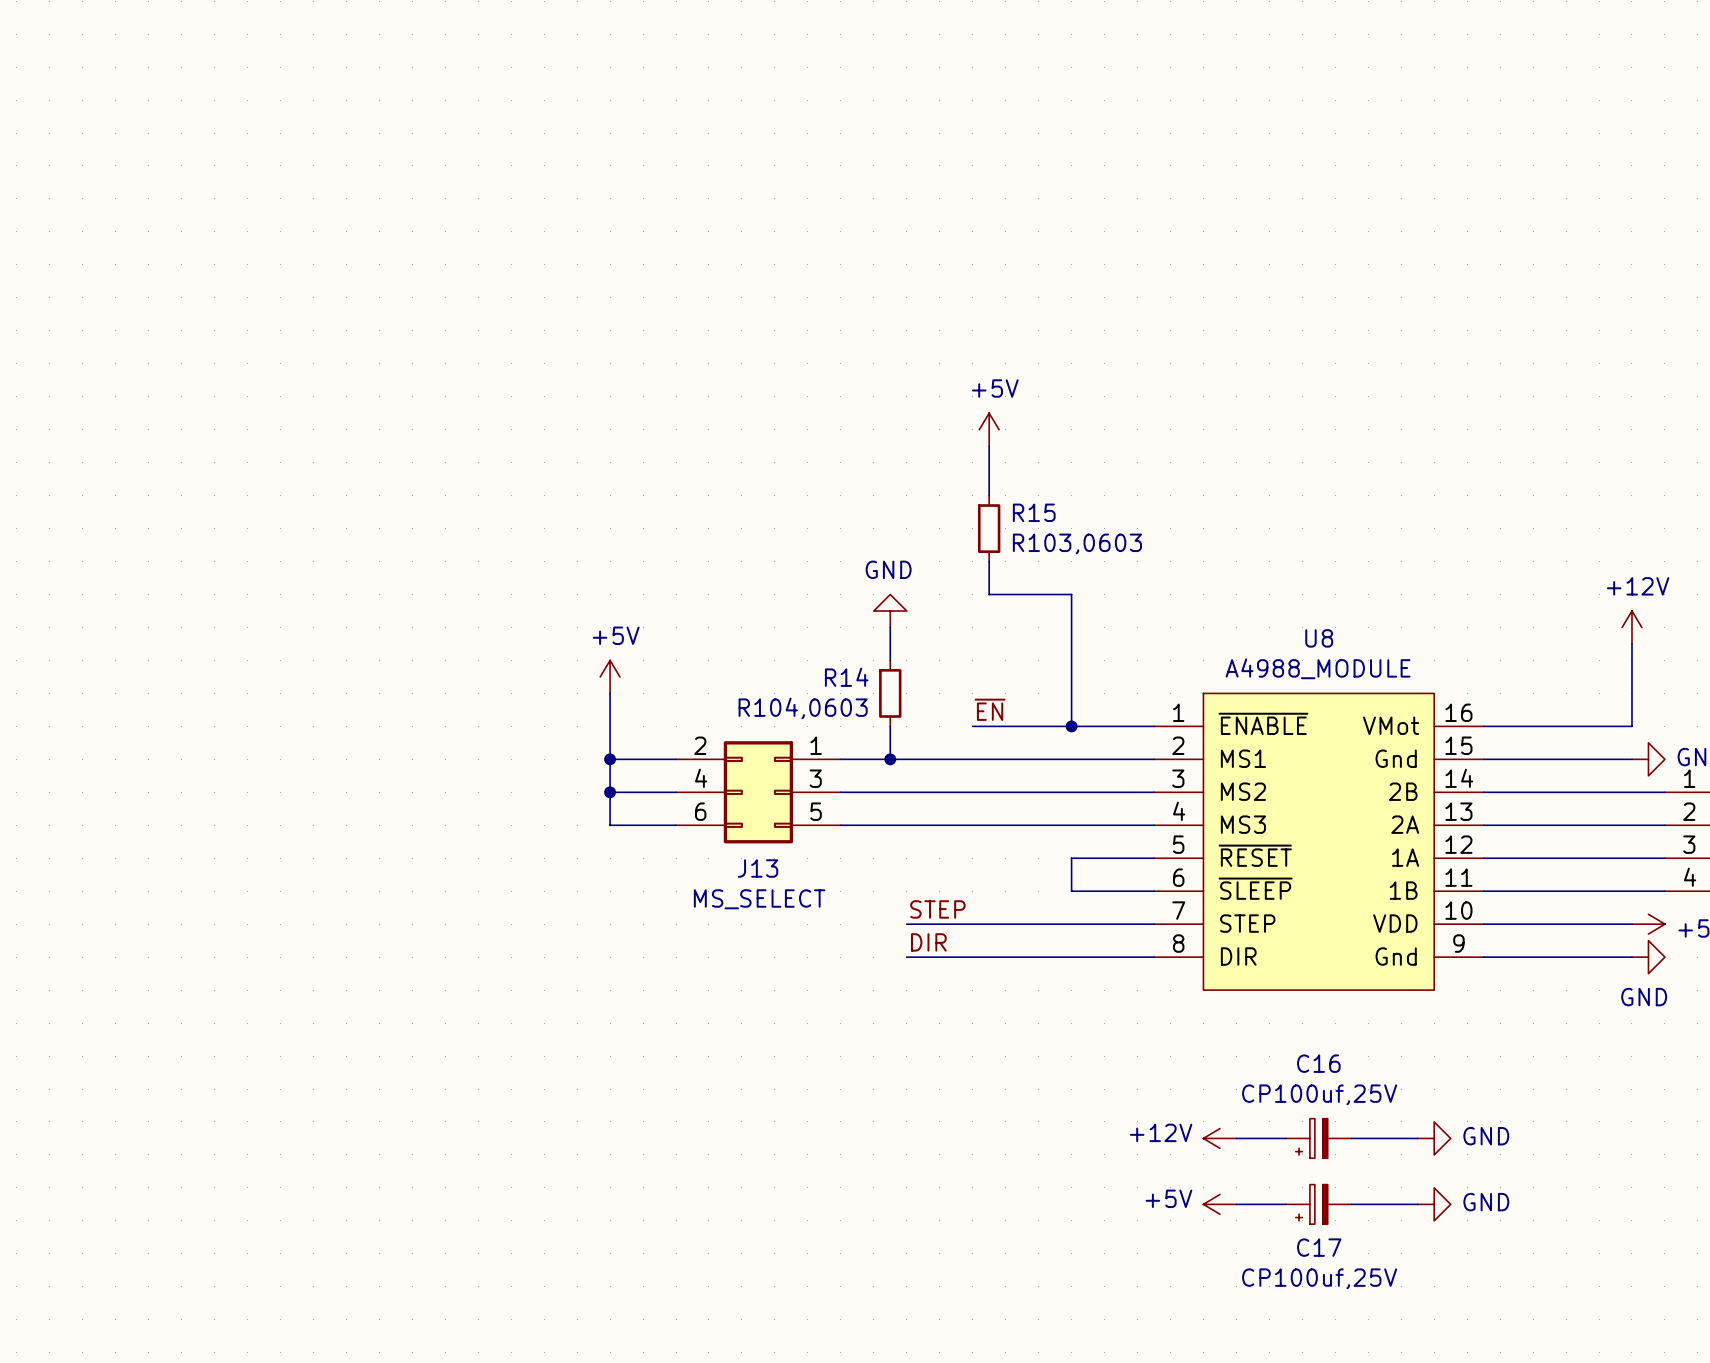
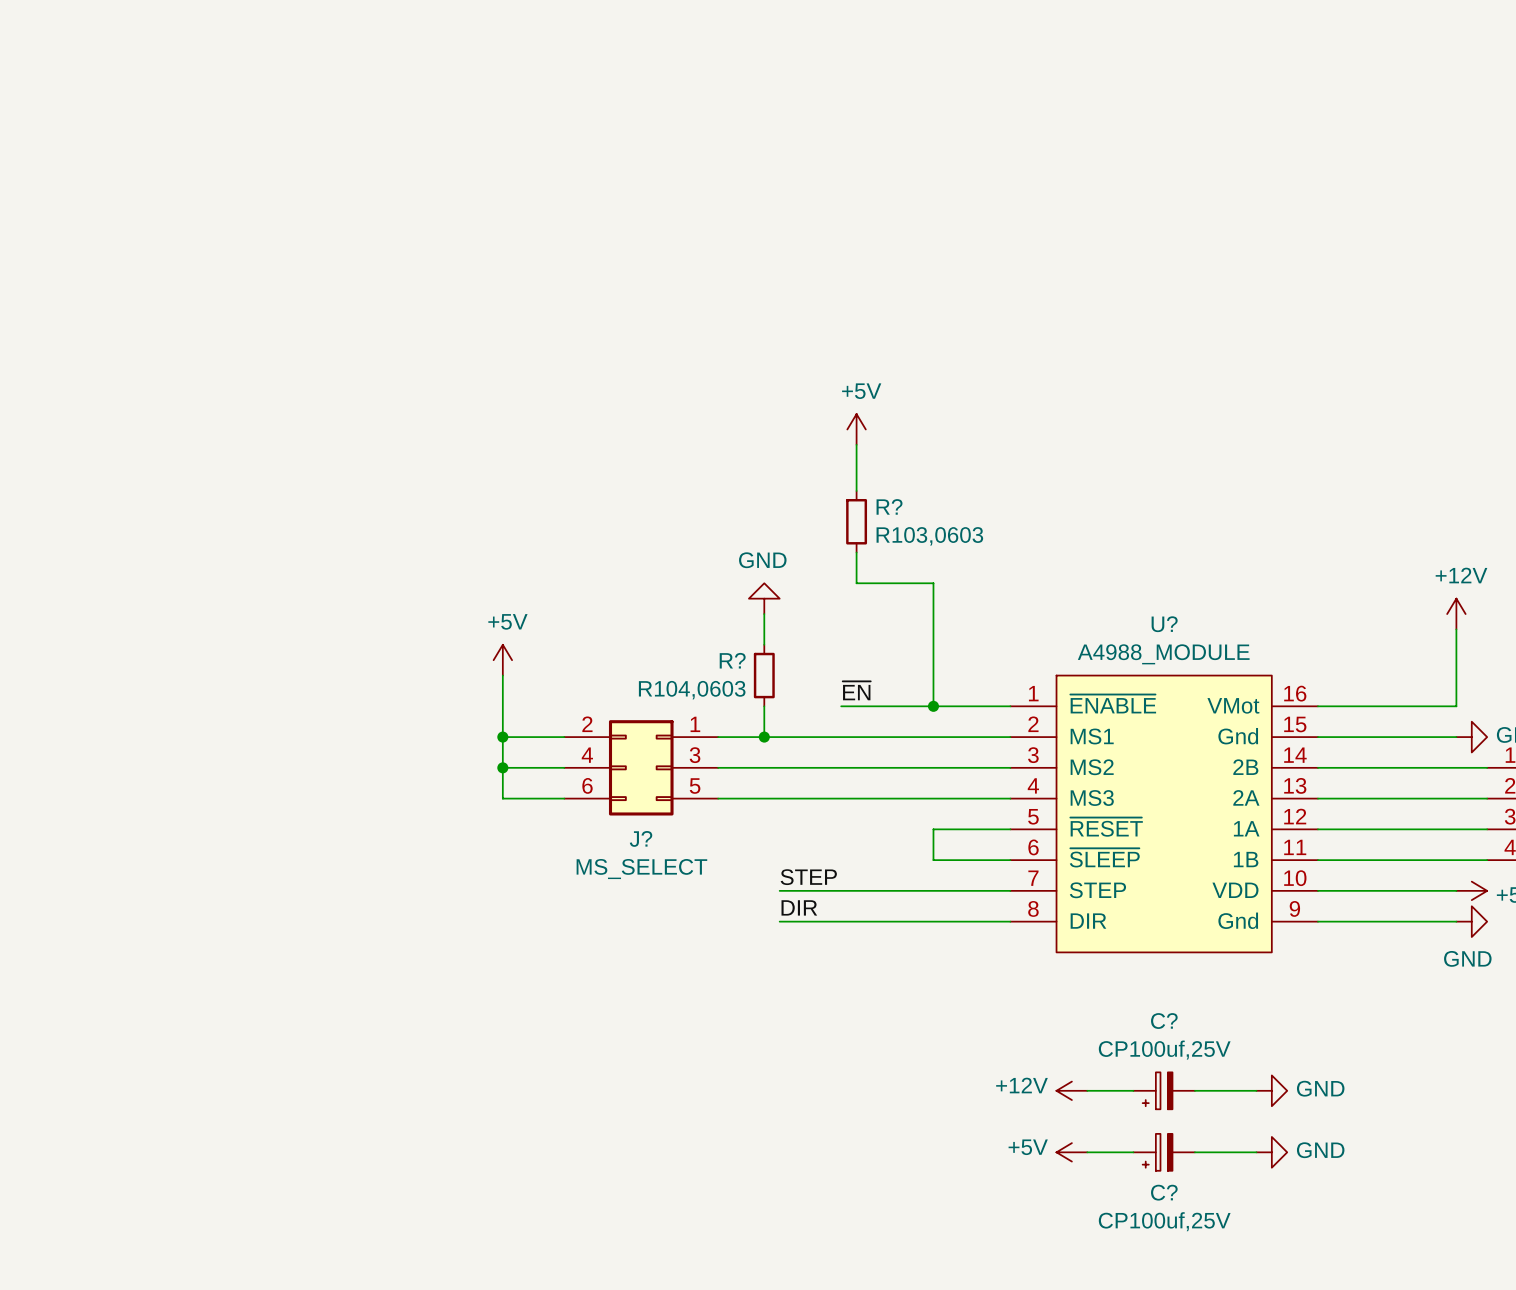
R15 name: R15 (1034, 512) -> R? (889, 506)
U8 name: U8 (1319, 638) -> U? (1164, 624)
R14 name: R14 (846, 677) -> R? (732, 660)
J13 name: J13 (758, 868) -> J? (641, 838)
C16 name: C16 (1318, 1063) -> C? (1164, 1021)
C17 name: C17 (1319, 1247) -> C? (1164, 1192)

